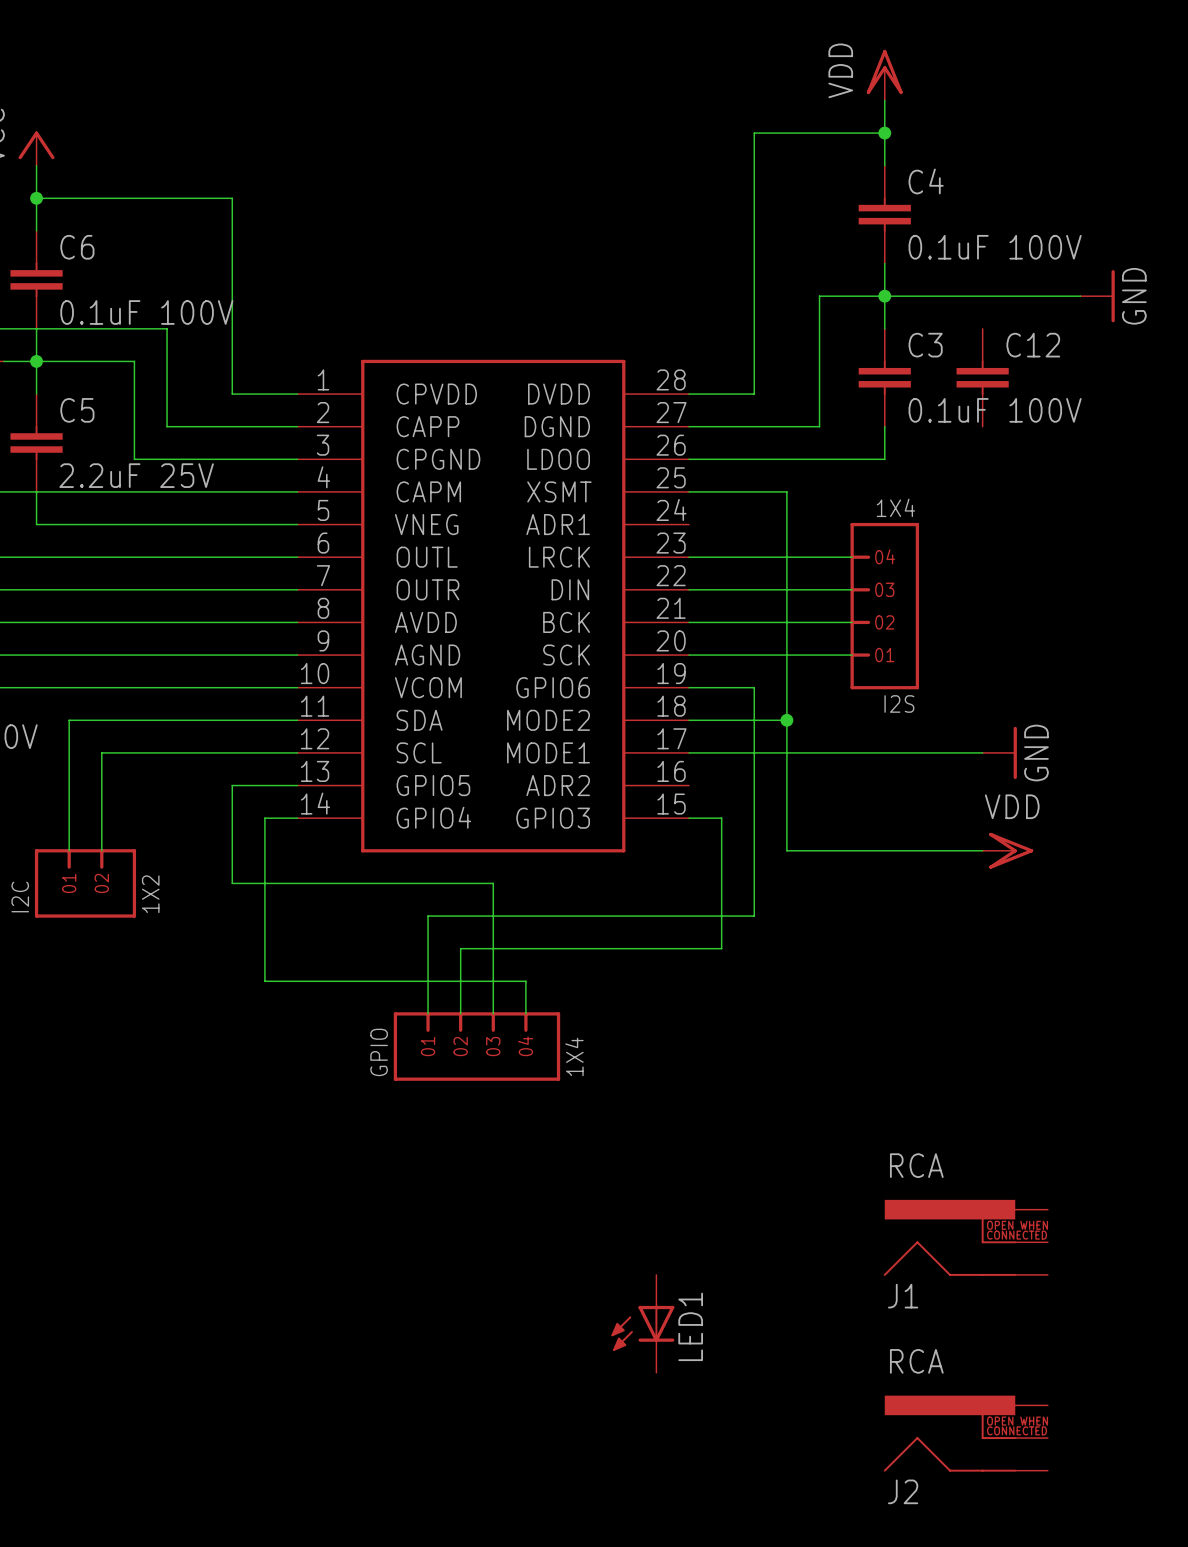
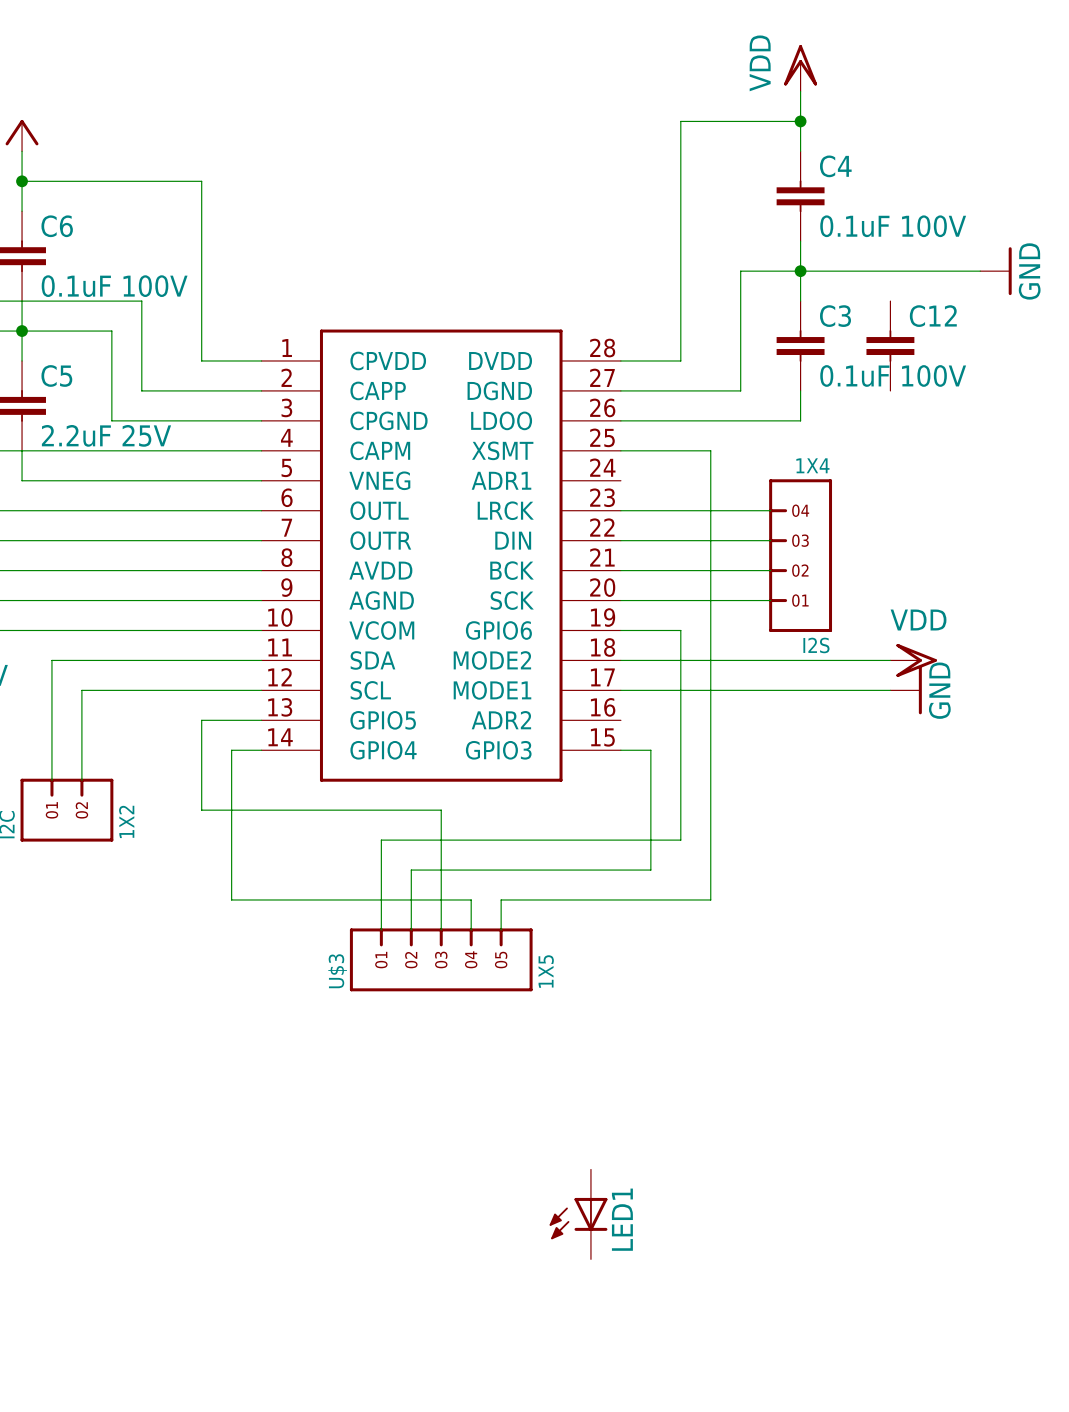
wire: none -> (710, 660) (890, 660)
junction: (786, 720) -> none
wire: (786, 850) (982, 850) -> (710, 780) (710, 899) (501, 899) (501, 929)
power symbol position: VDD (1007, 850) -> VDD (913, 660)
GPIO: 1X4 (476, 1046) -> none
U$3: none -> 1X5 (441, 959)
J1: RCA (965, 1237) -> none
J2: RCA (965, 1433) -> none

